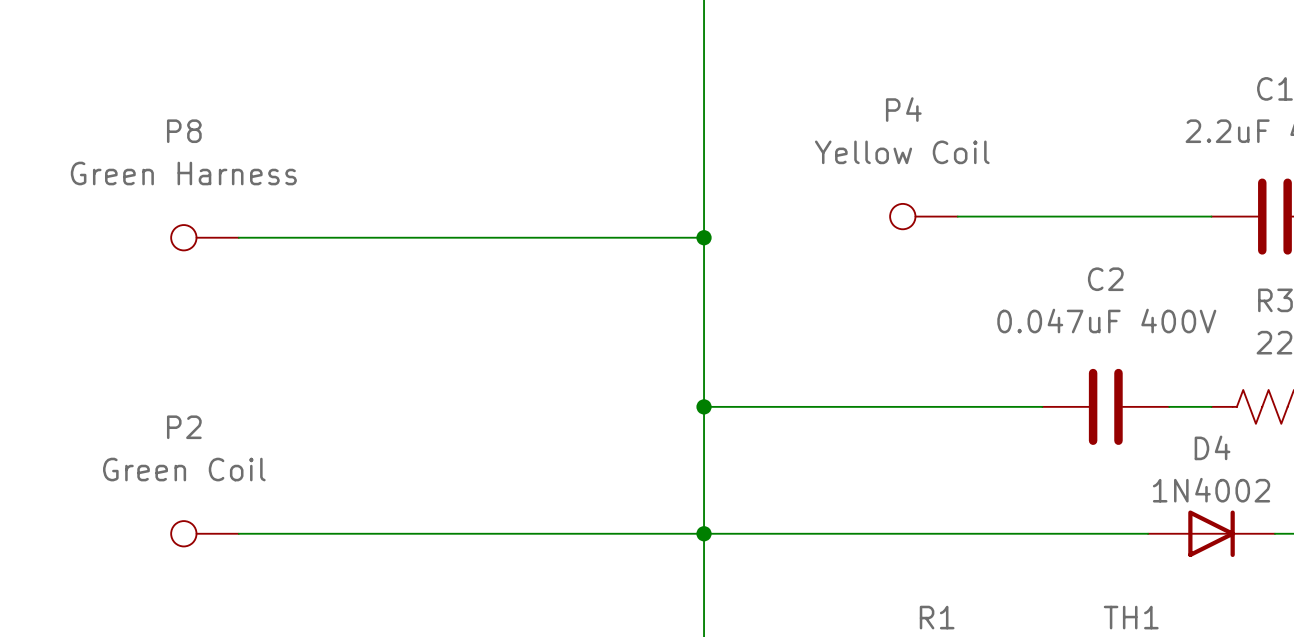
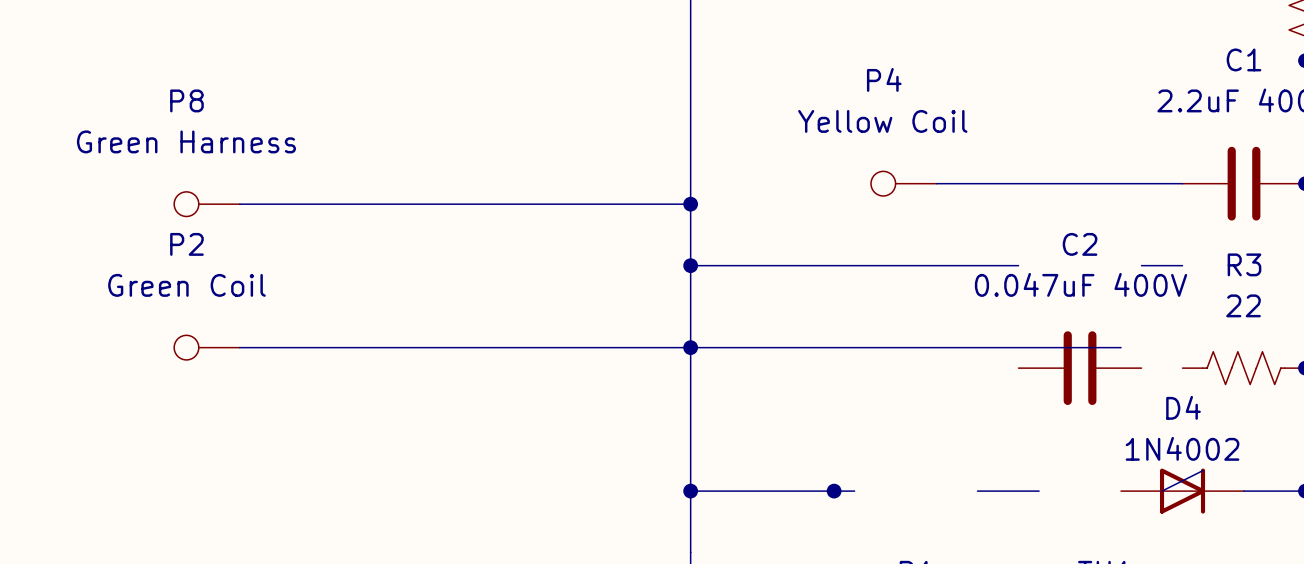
junction: none -> (690, 265)
wire: none -> (239, 347) (1121, 347)
wire: (704, 406) (1042, 406) -> (690, 265) (1018, 265)
junction position: (704, 406) -> (690, 347)
wire: (1169, 406) (1211, 406) -> (1141, 265) (1182, 265)
wire: none -> (1203, 470) (1162, 491)
P2 position: (204, 533) -> (206, 347)
wire: (238, 533) (704, 533) -> none
junction: none -> (834, 491)
wire: (873, 533) (1000, 533) -> none
wire: (1063, 533) (1148, 533) -> none

